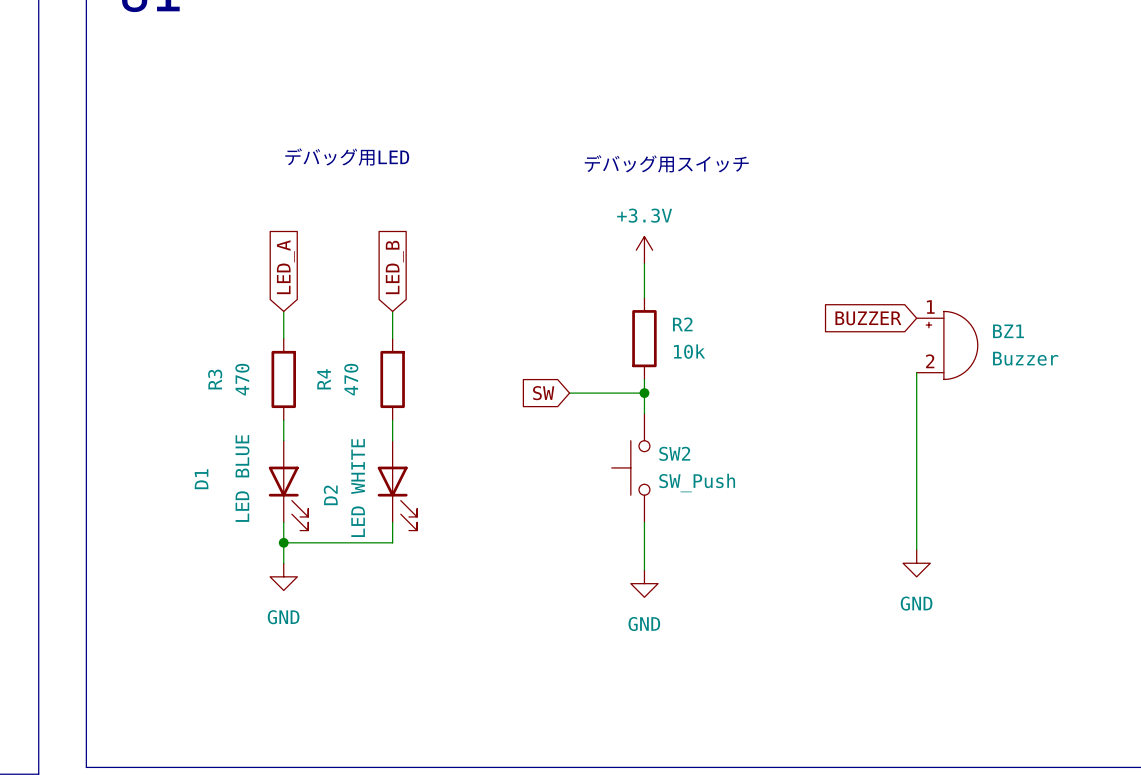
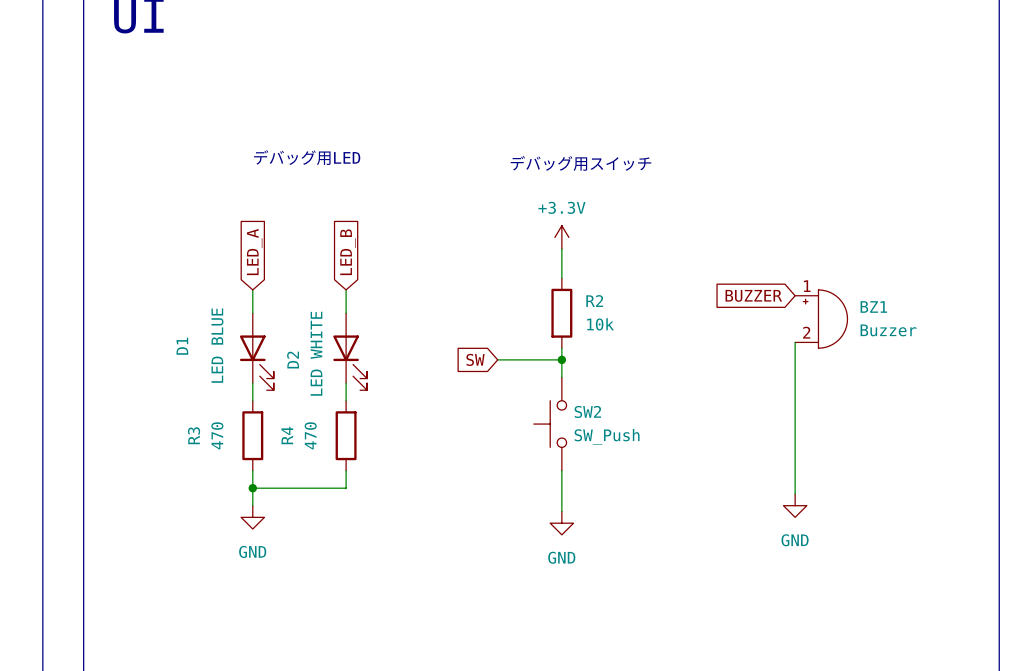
R3 position: (283, 379) -> (252, 435)
R4 position: (392, 379) -> (346, 435)
D1 position: (288, 485) -> (256, 351)
D2 position: (397, 485) -> (350, 351)

